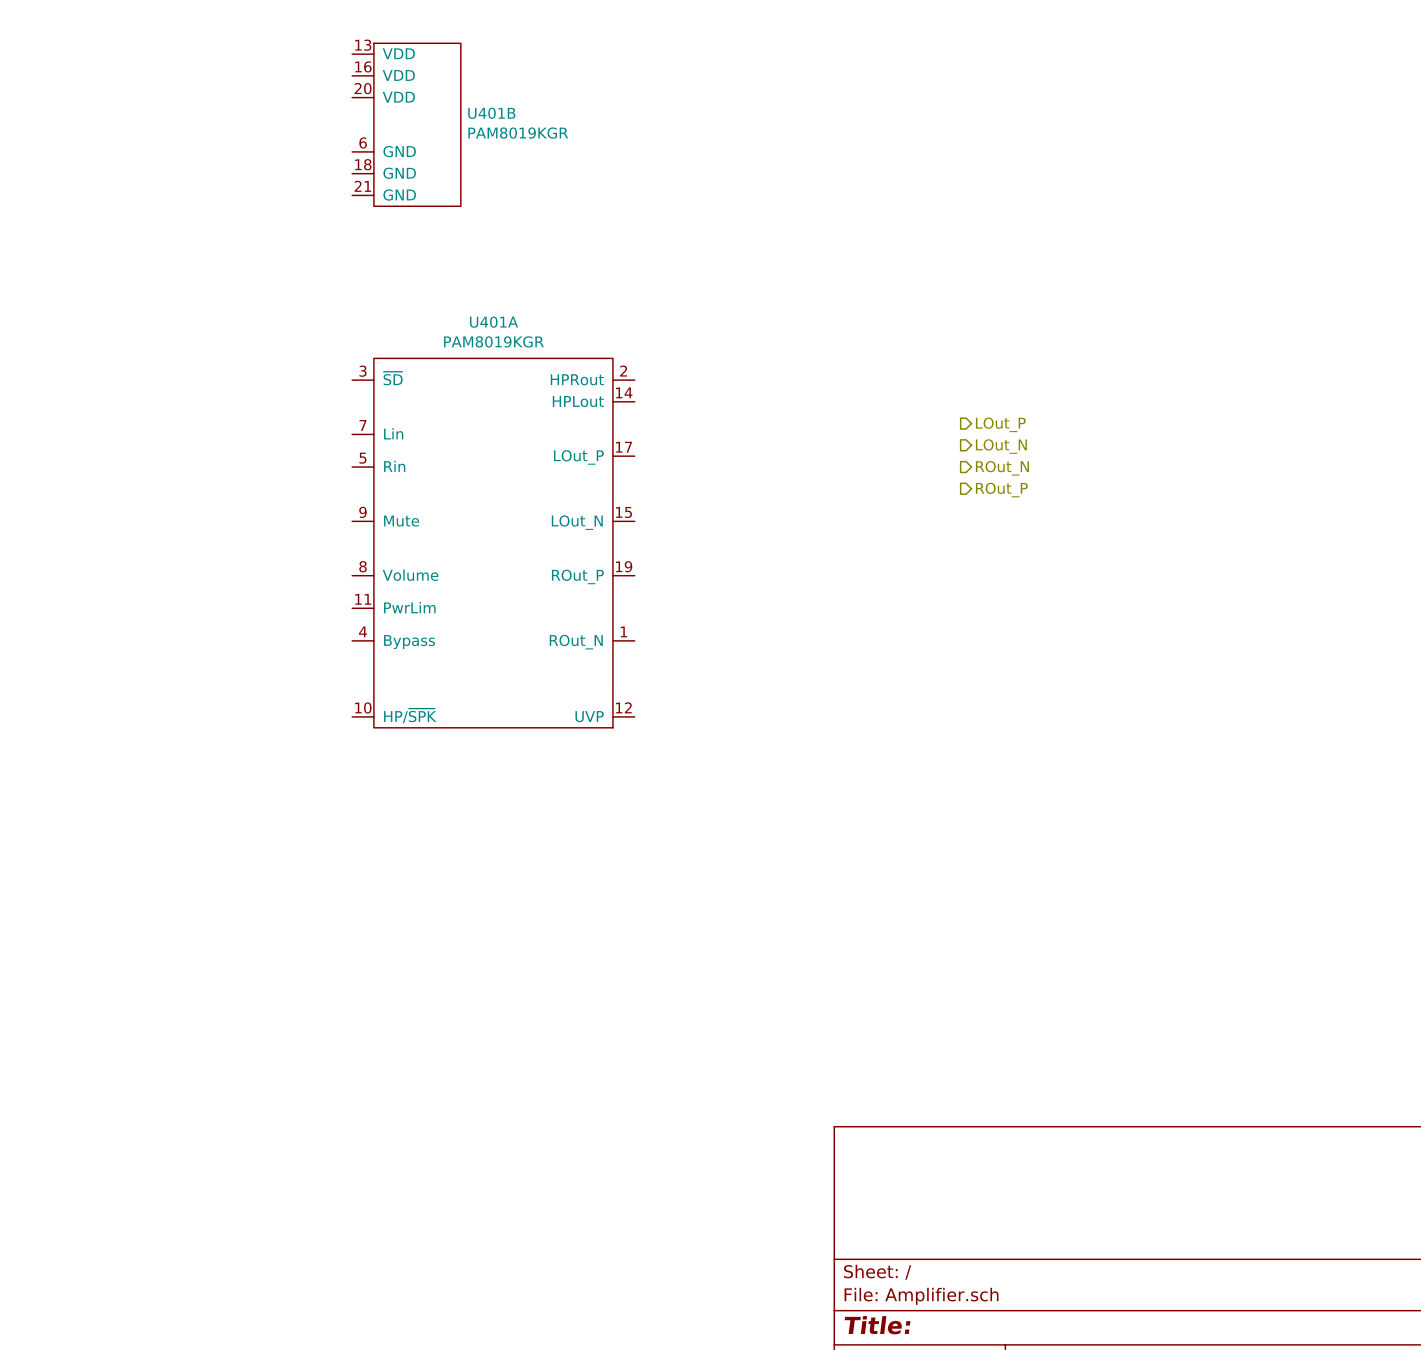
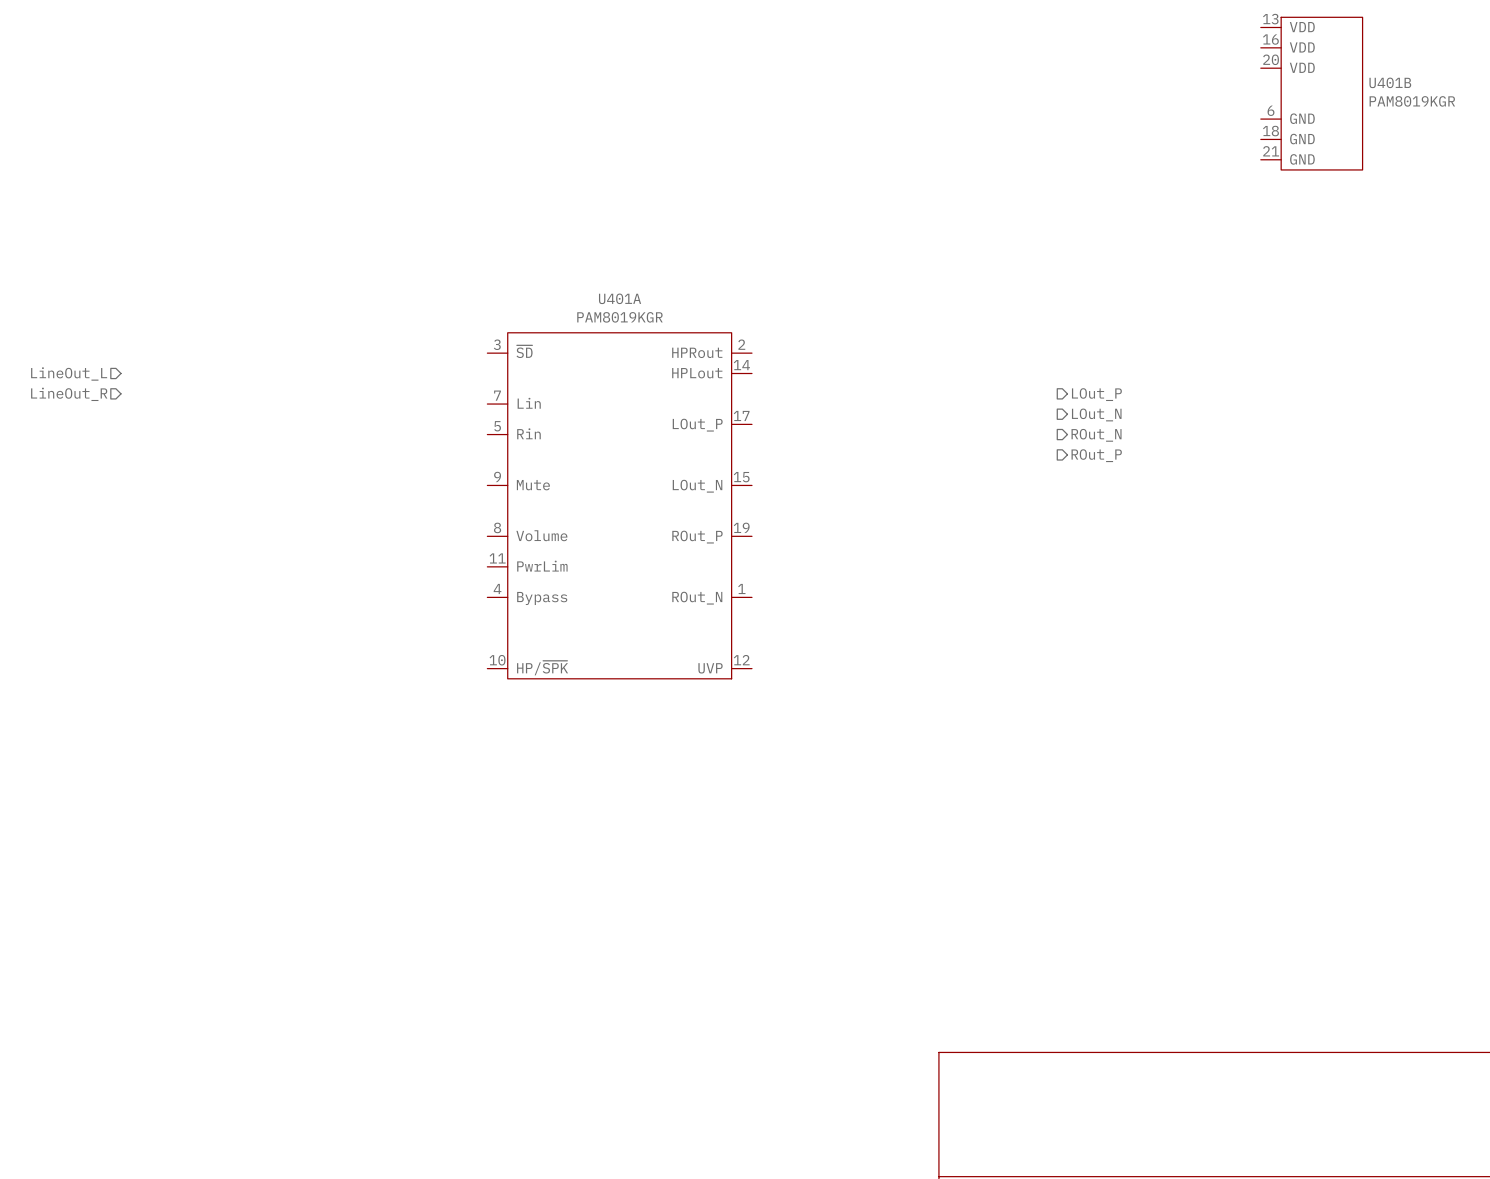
U401B position: (406, 124) -> (1311, 93)

